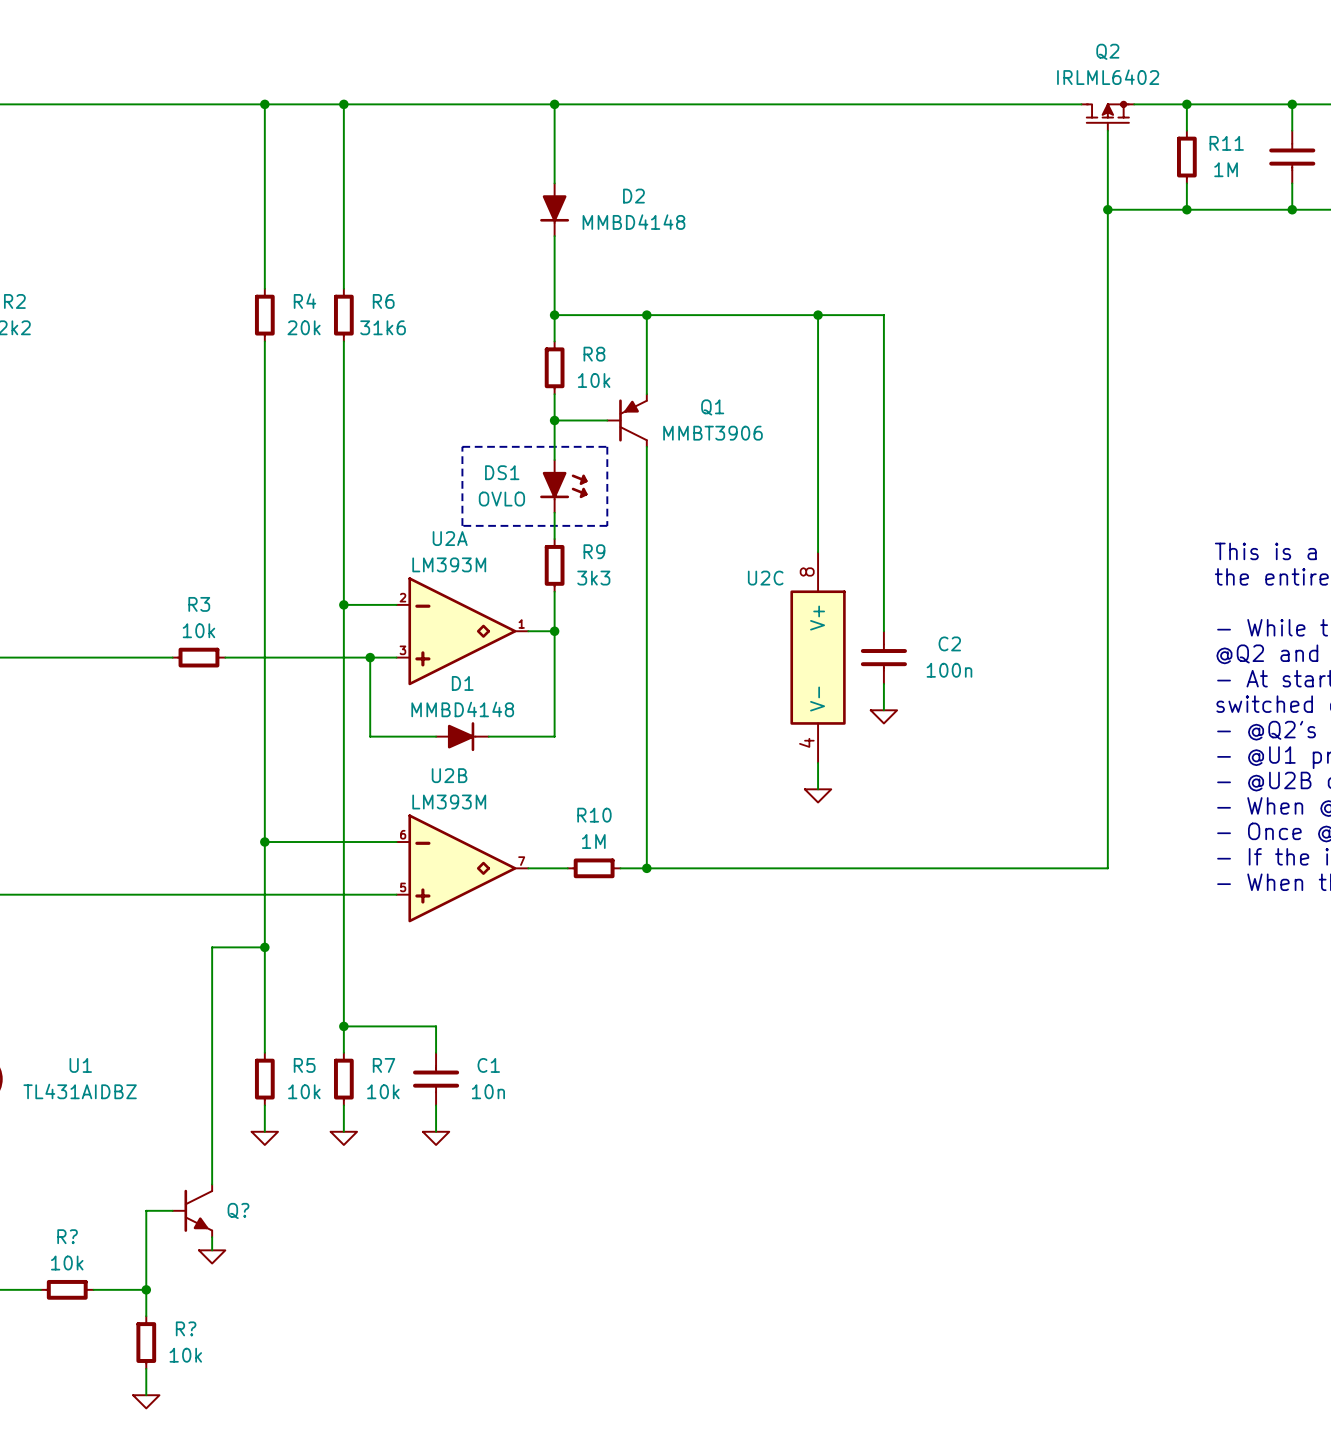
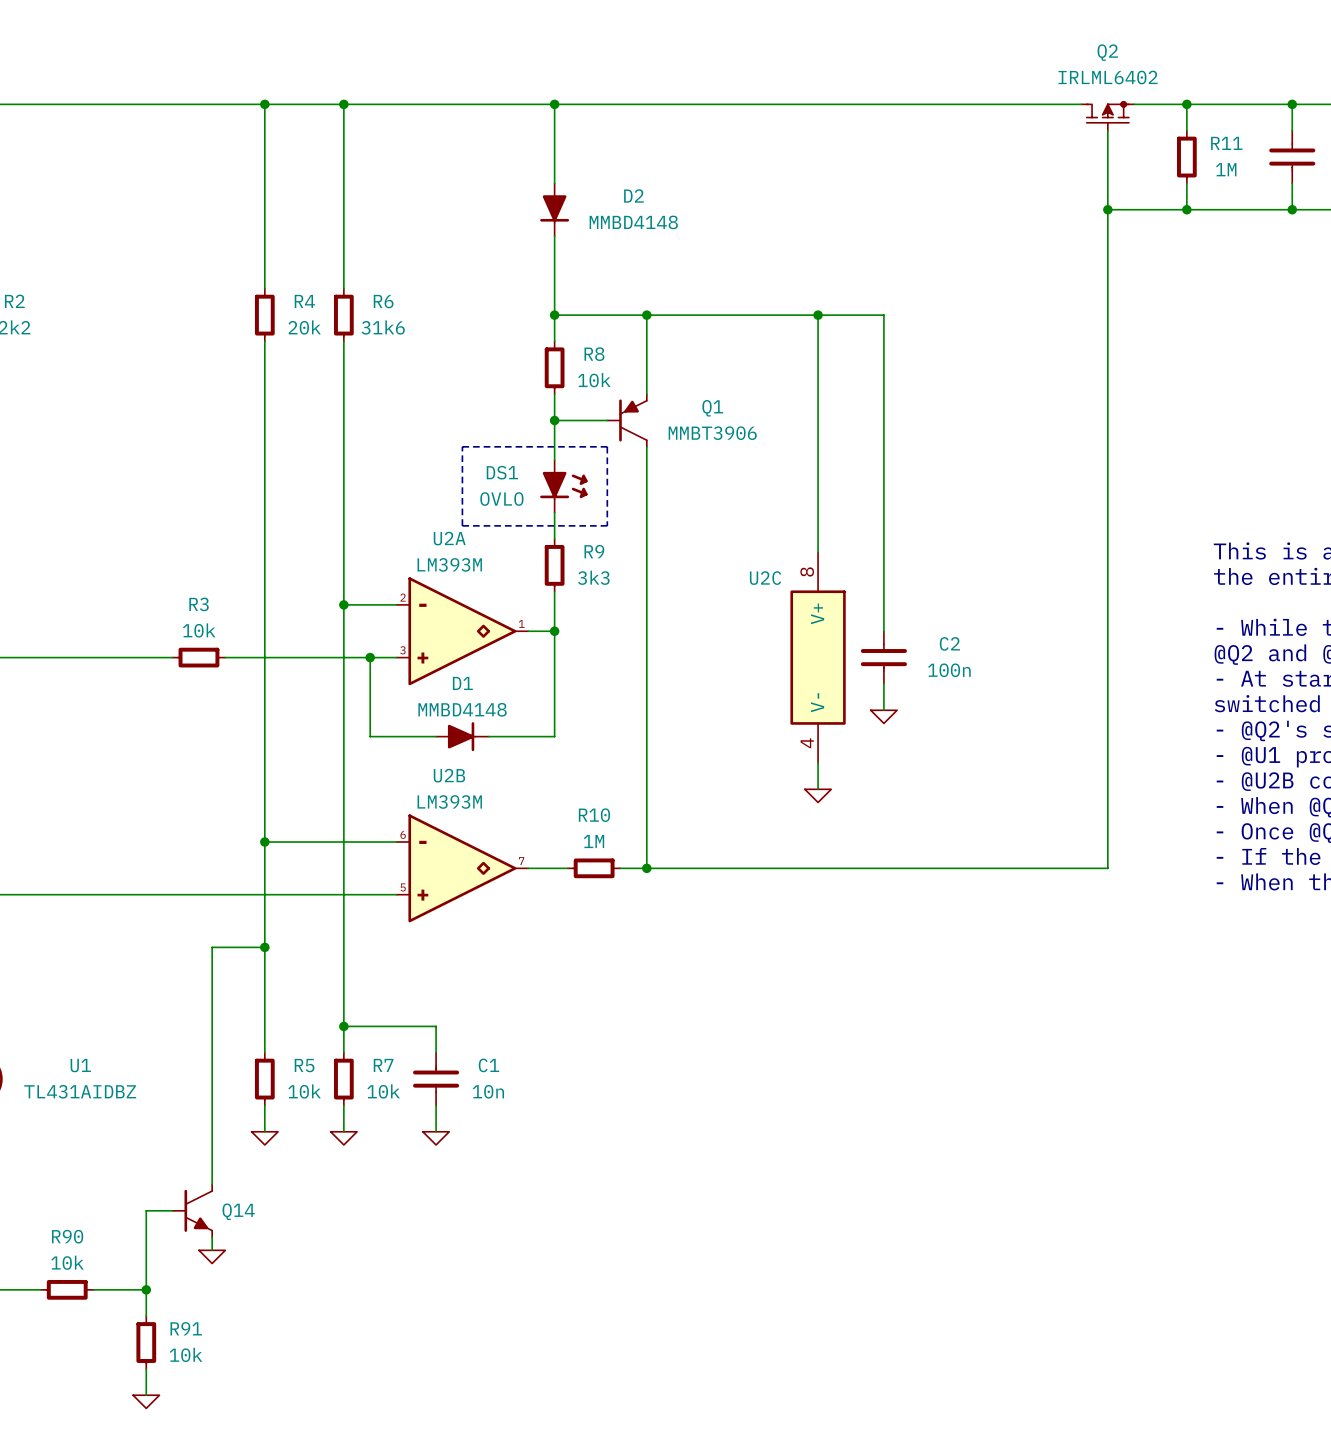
Q? name: Q? (238, 1210) -> Q14 (238, 1211)
R? name: R? (67, 1236) -> R90 (67, 1236)
R? name: R? (186, 1328) -> R91 (186, 1328)

